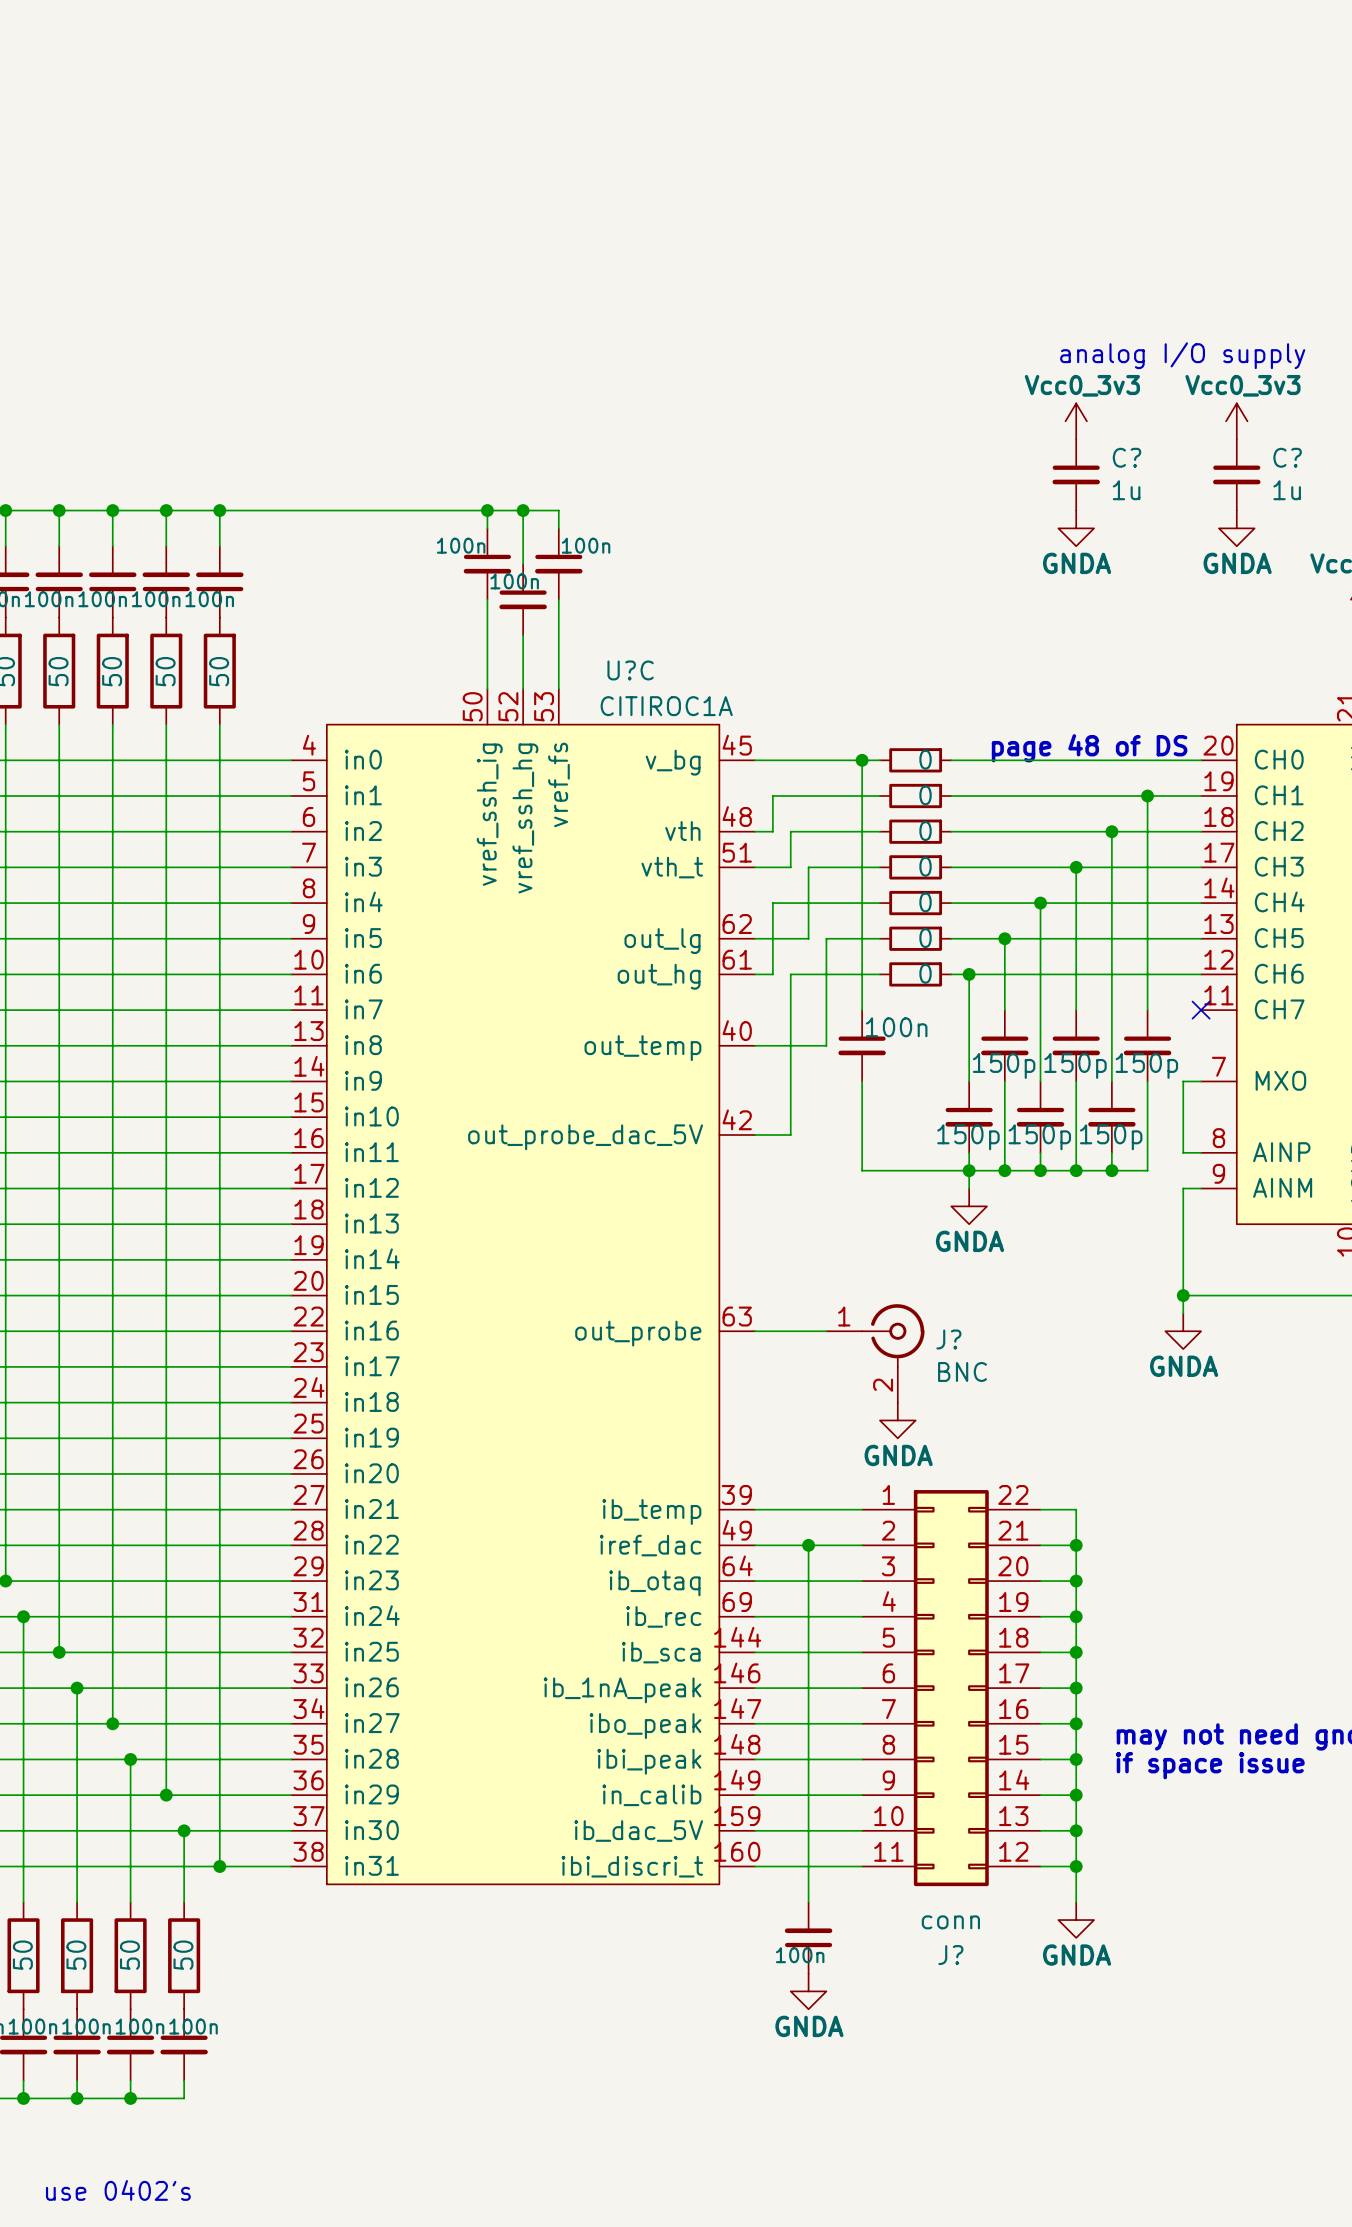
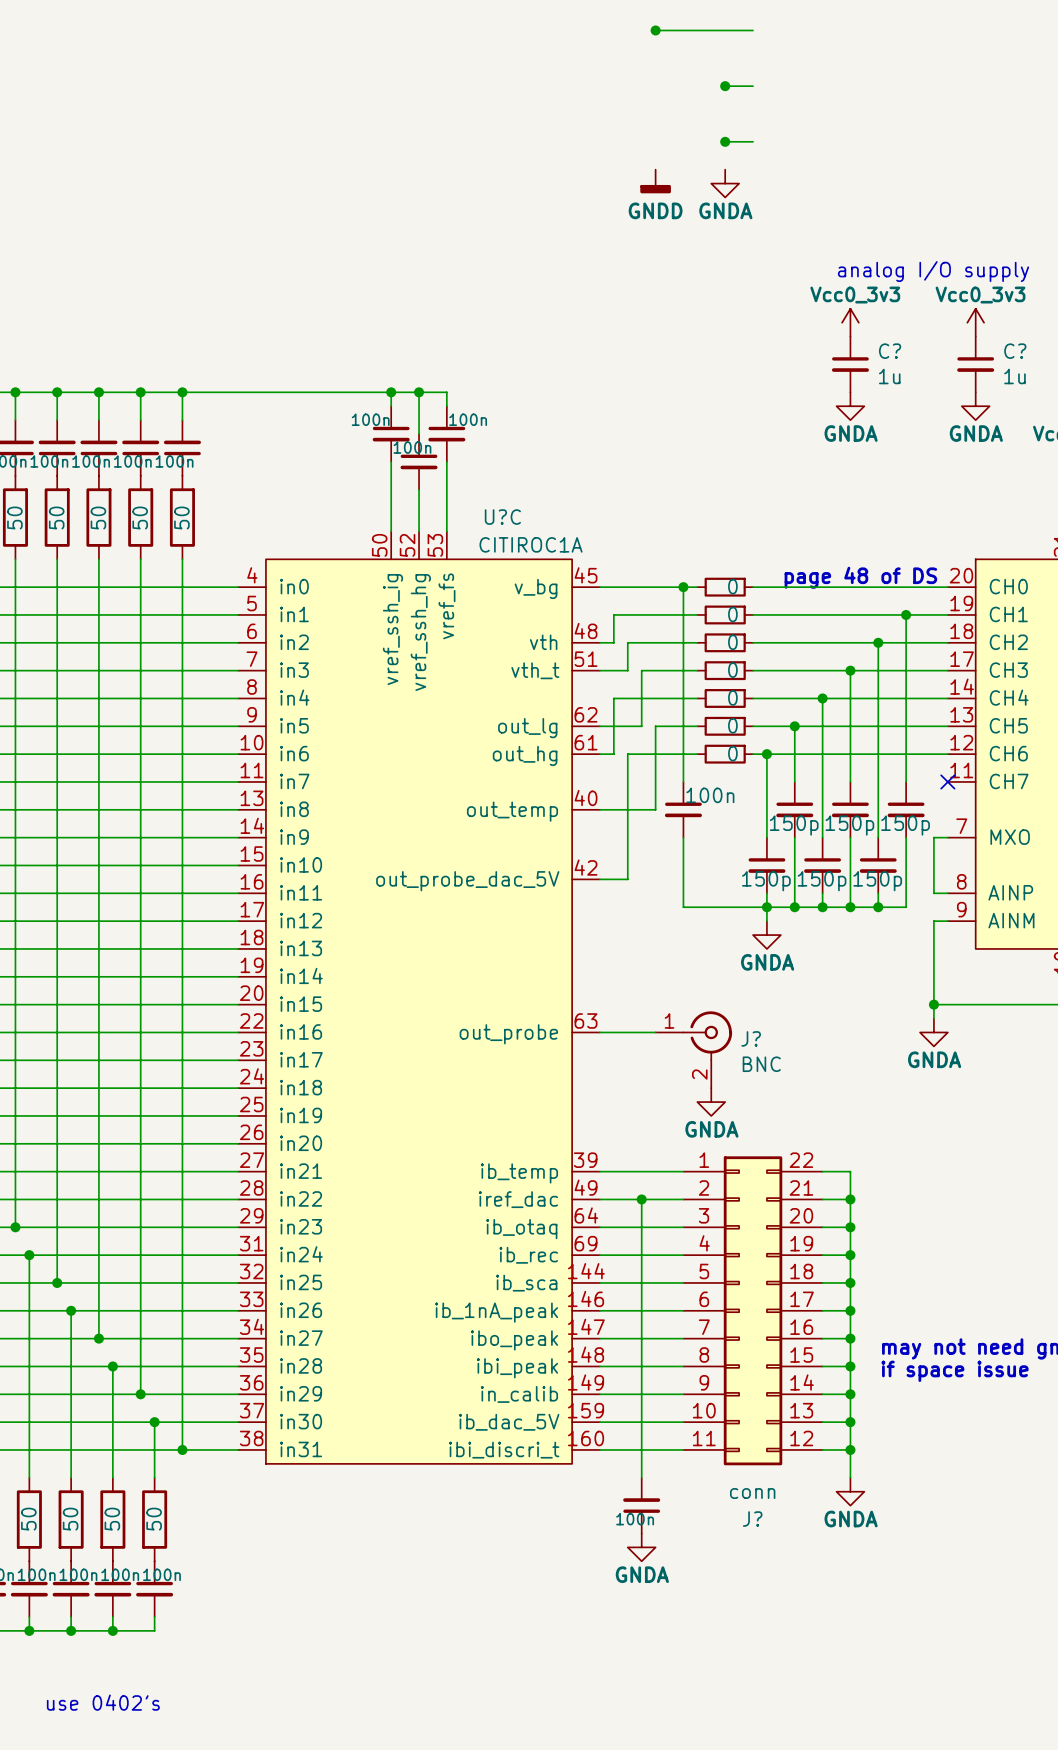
wire: none -> (655, 30) (753, 30)
junction: none -> (655, 30)
wire: none -> (725, 86) (753, 86)
junction: none -> (725, 86)
wire: none -> (725, 141) (753, 141)
junction: none -> (725, 141)
power symbol: none -> GNDD (655, 181)
power symbol: none -> GNDA (725, 183)

